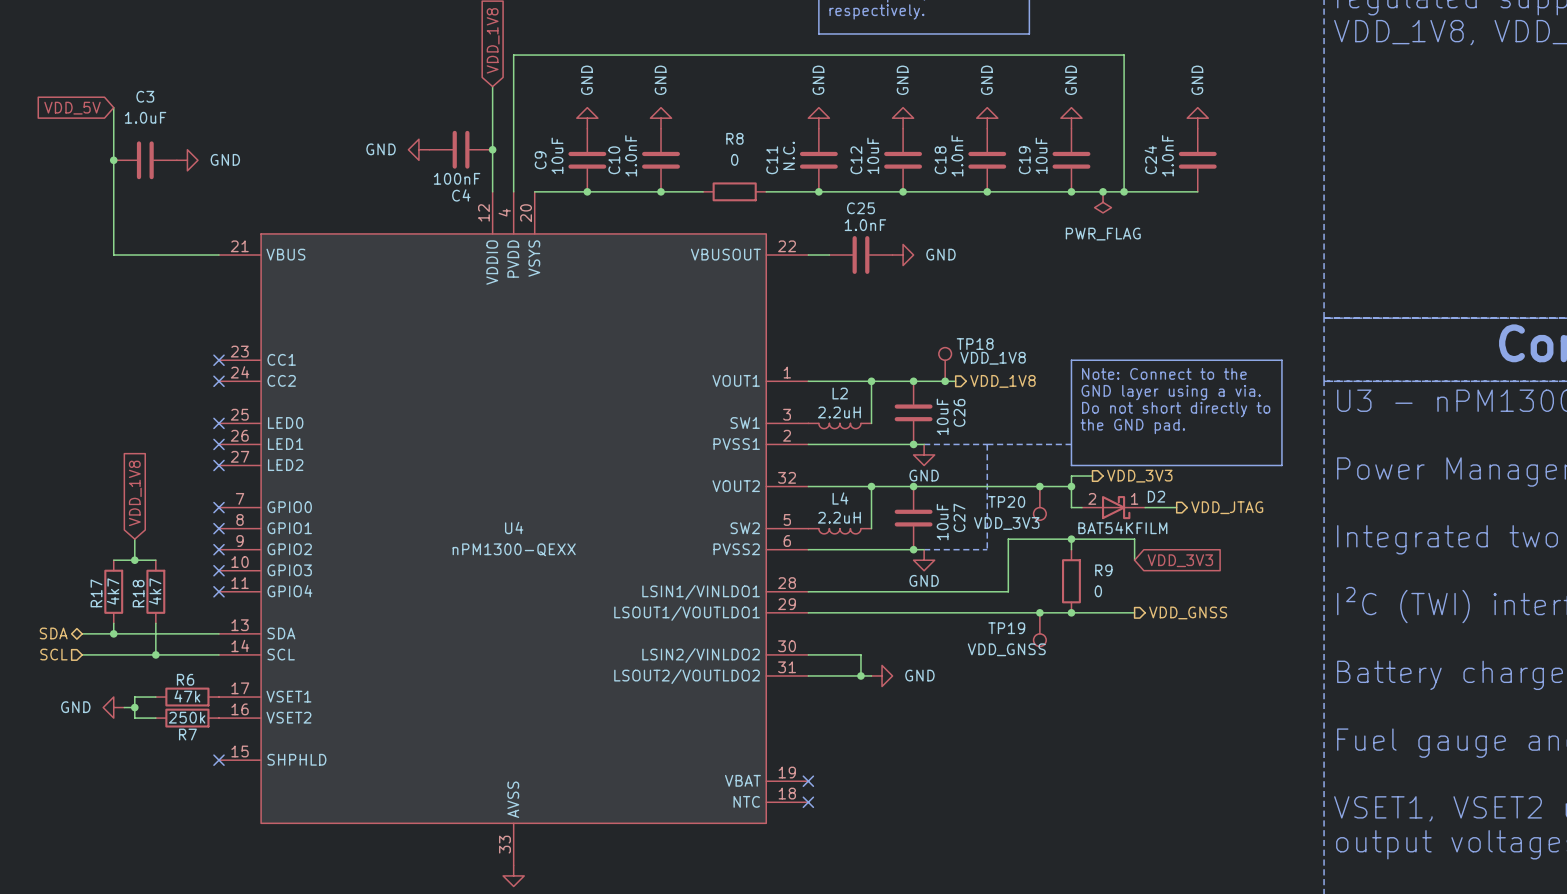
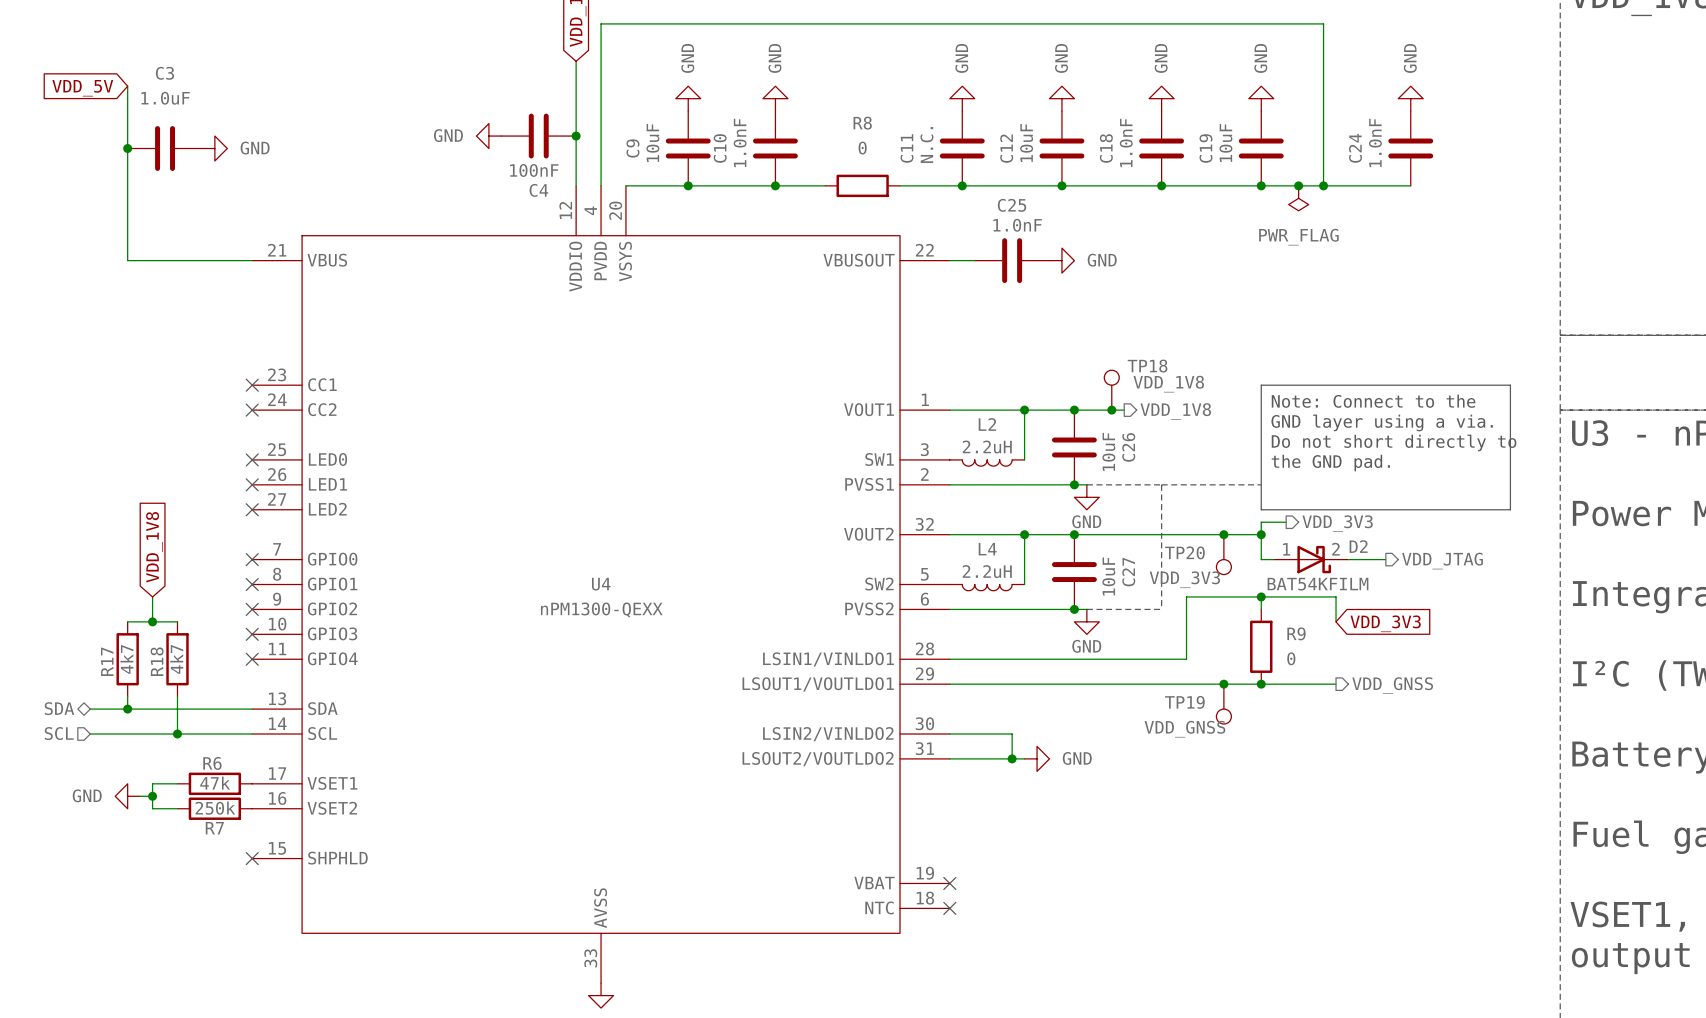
D2 pin number: 2 (1092, 498) -> 1 (1286, 549)
D2 pin number: 1 (1134, 498) -> 2 (1335, 549)

